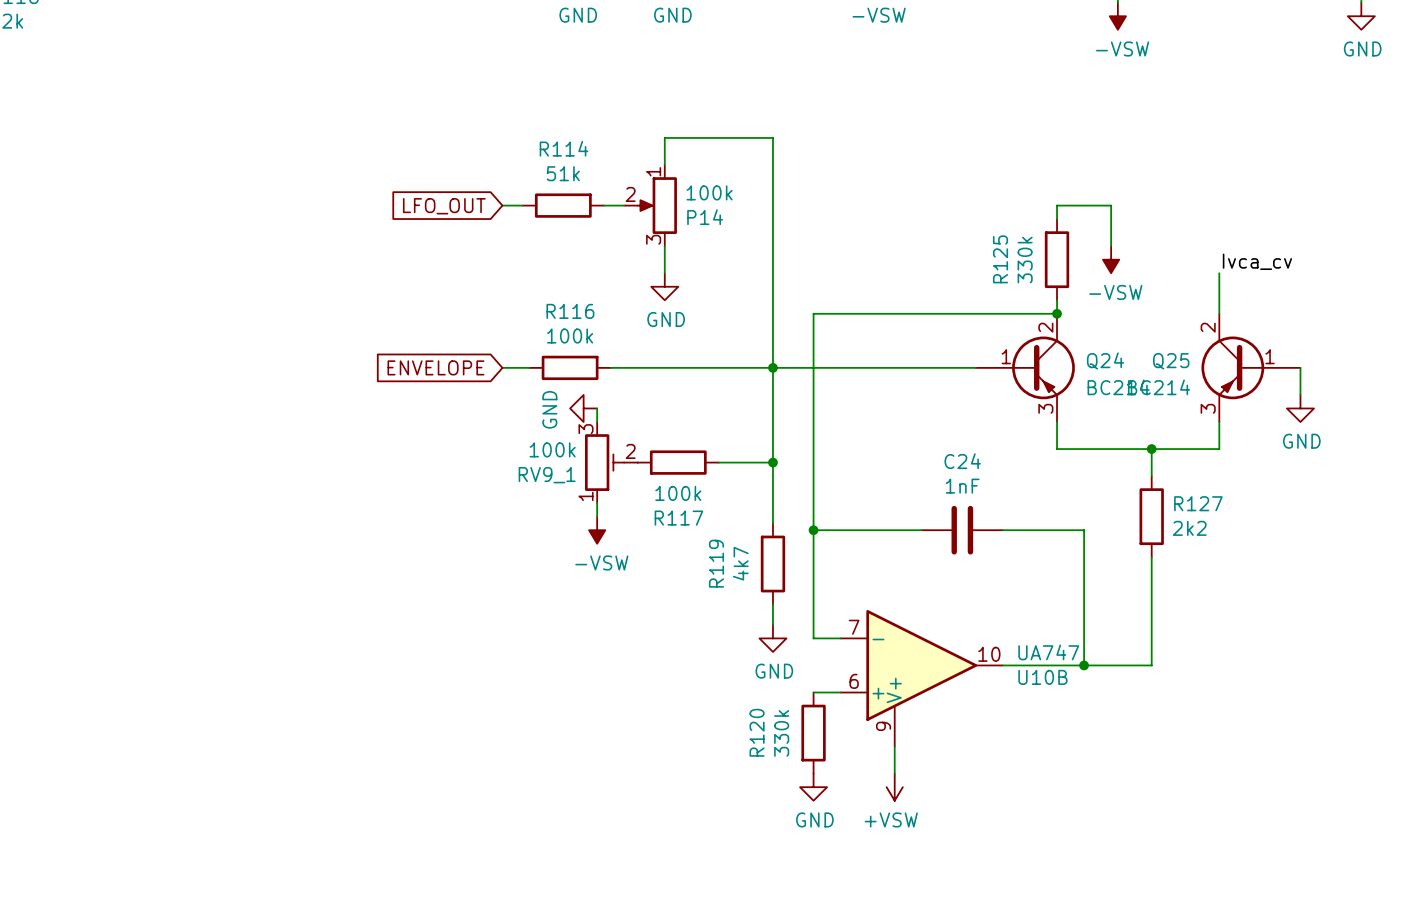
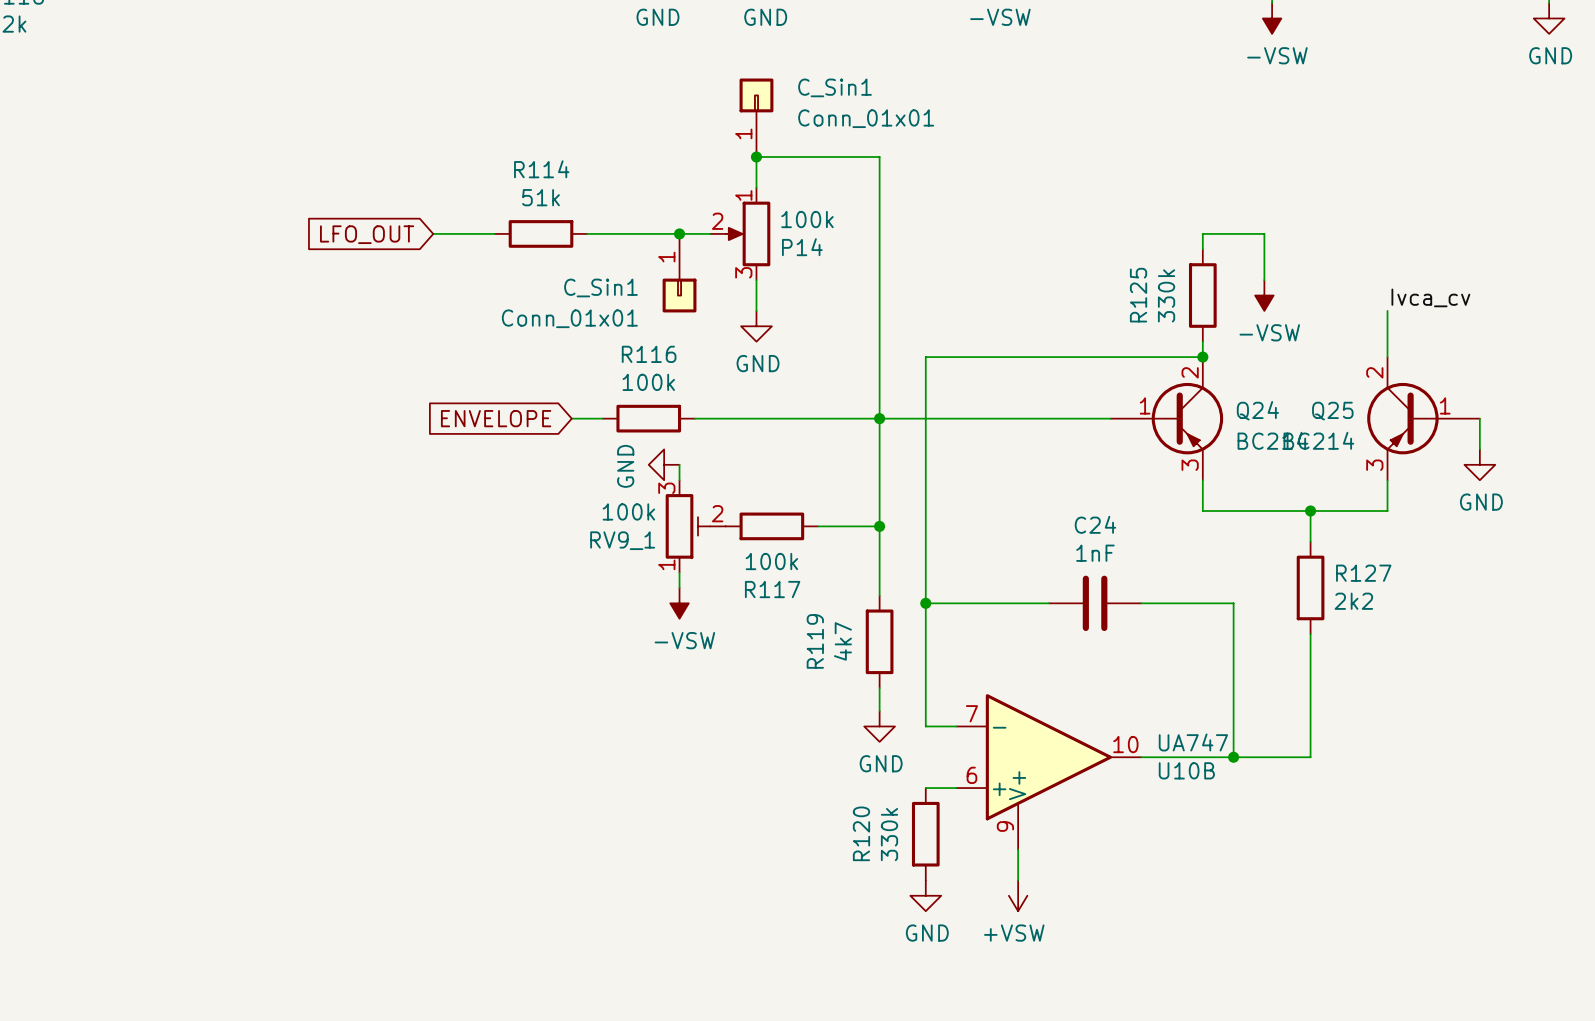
C_Sin1: none -> Conn_01x01 (756, 117)
junction: none -> (756, 157)
wire: none -> (433, 233) (494, 233)
wire: none -> (594, 233) (687, 233)
R114 position: (563, 205) -> (541, 233)
junction: none -> (679, 233)
global label position: LFO_OUT (444, 206) -> LFO_OUT (367, 234)
C_Sin1: none -> Conn_01x01 (679, 273)

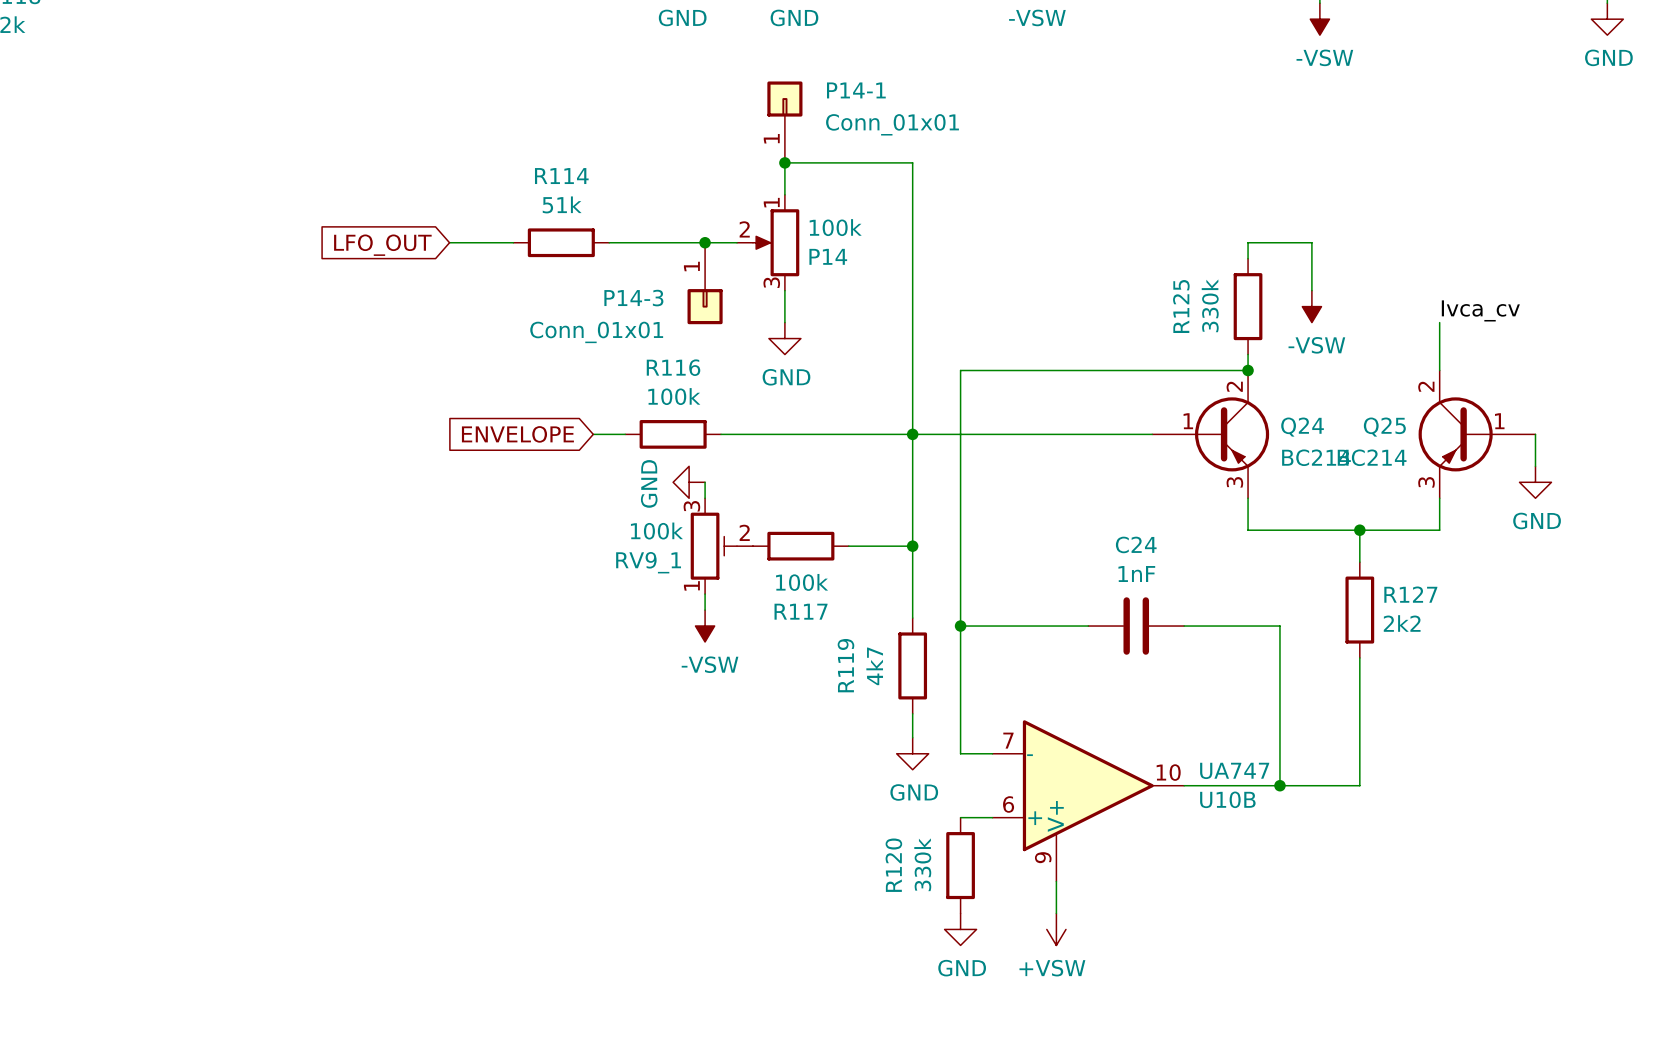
C_Sin1 name: C_Sin1 (835, 87) -> P14-1 (856, 90)
C_Sin1 name: C_Sin1 (600, 287) -> P14-3 (633, 298)

